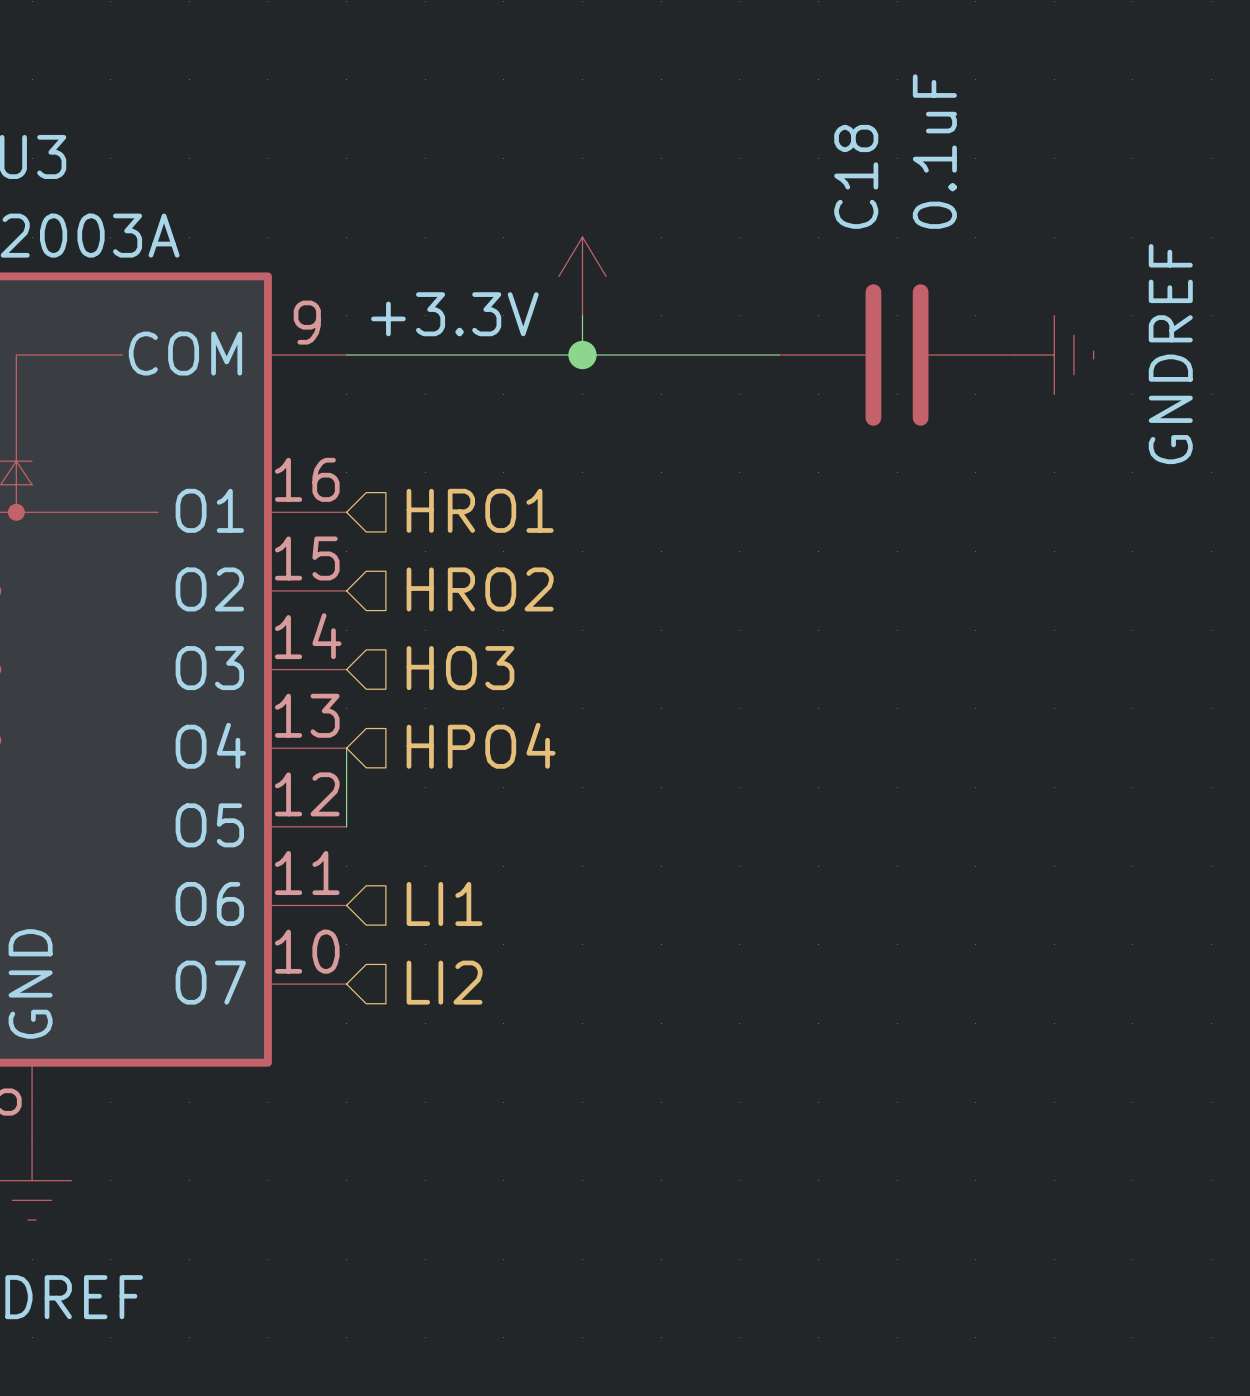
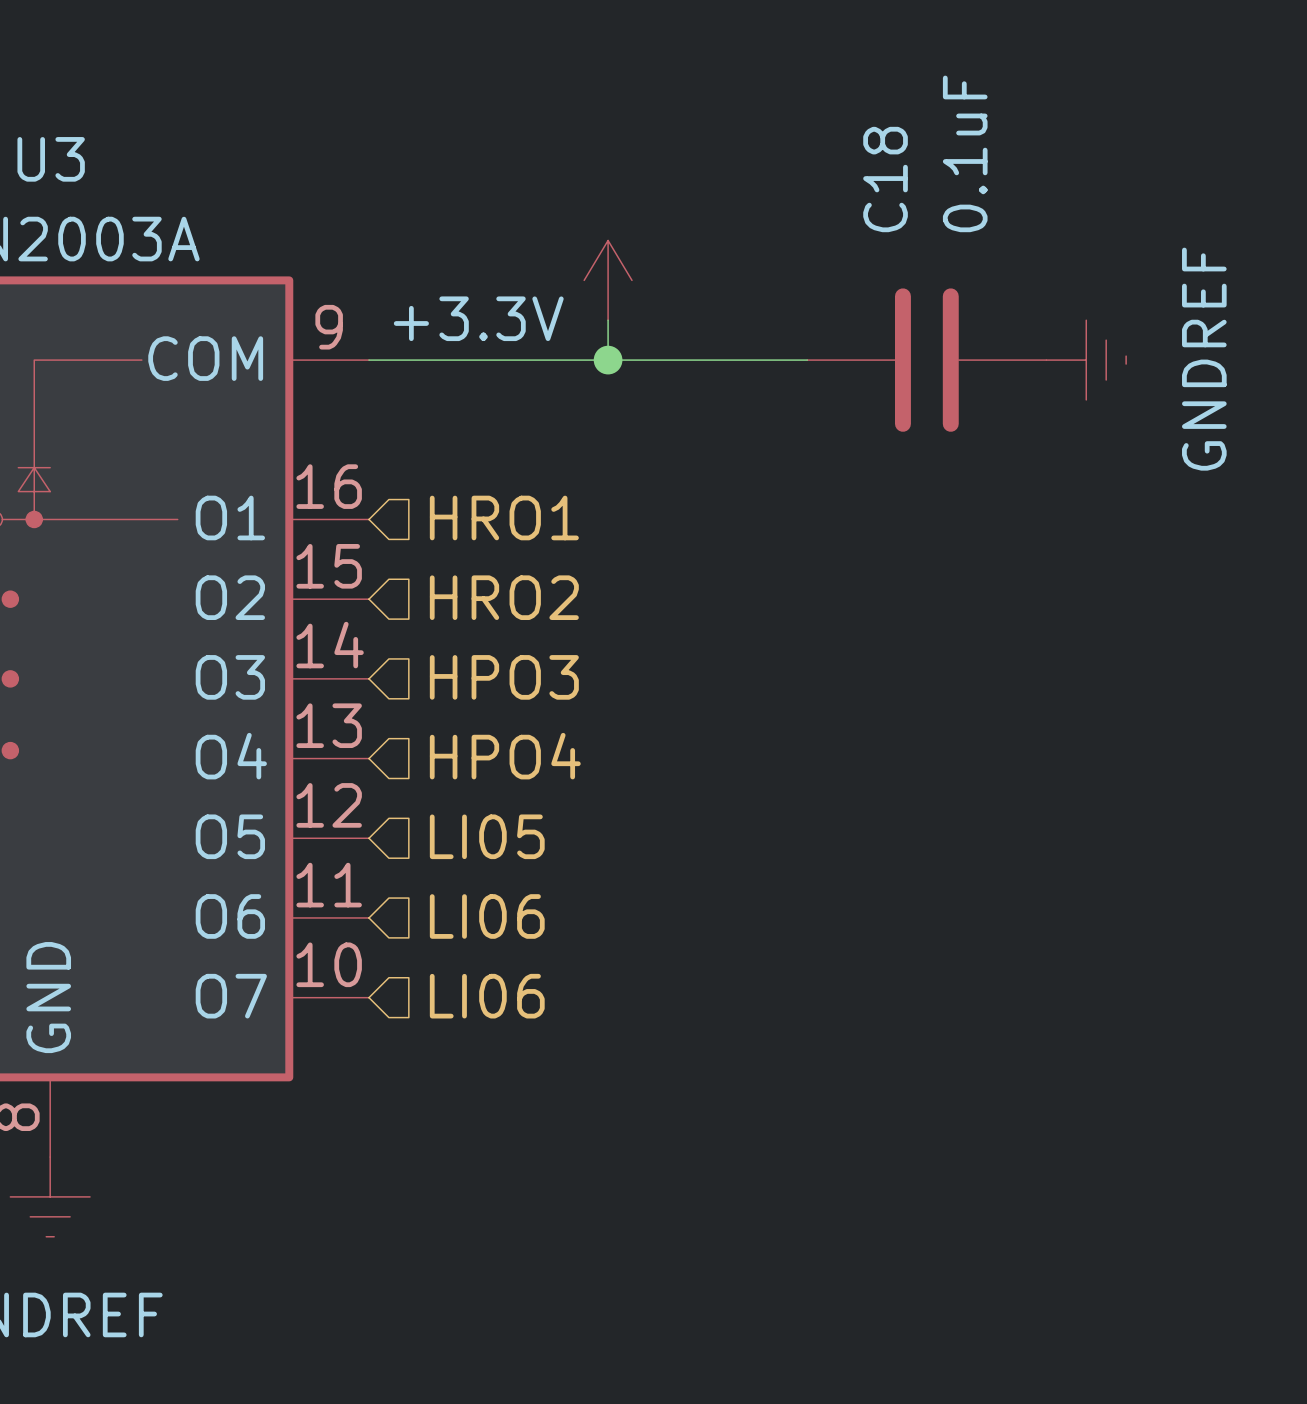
hierarchical label: HO3 (460, 668) -> HPO3 (504, 677)
wire: (346, 748) (346, 826) -> none
hierarchical label: none -> LI05 (487, 836)
hierarchical label: LI1 (444, 903) -> LI06 (487, 916)
hierarchical label: LI2 (444, 982) -> LI06 (487, 996)

